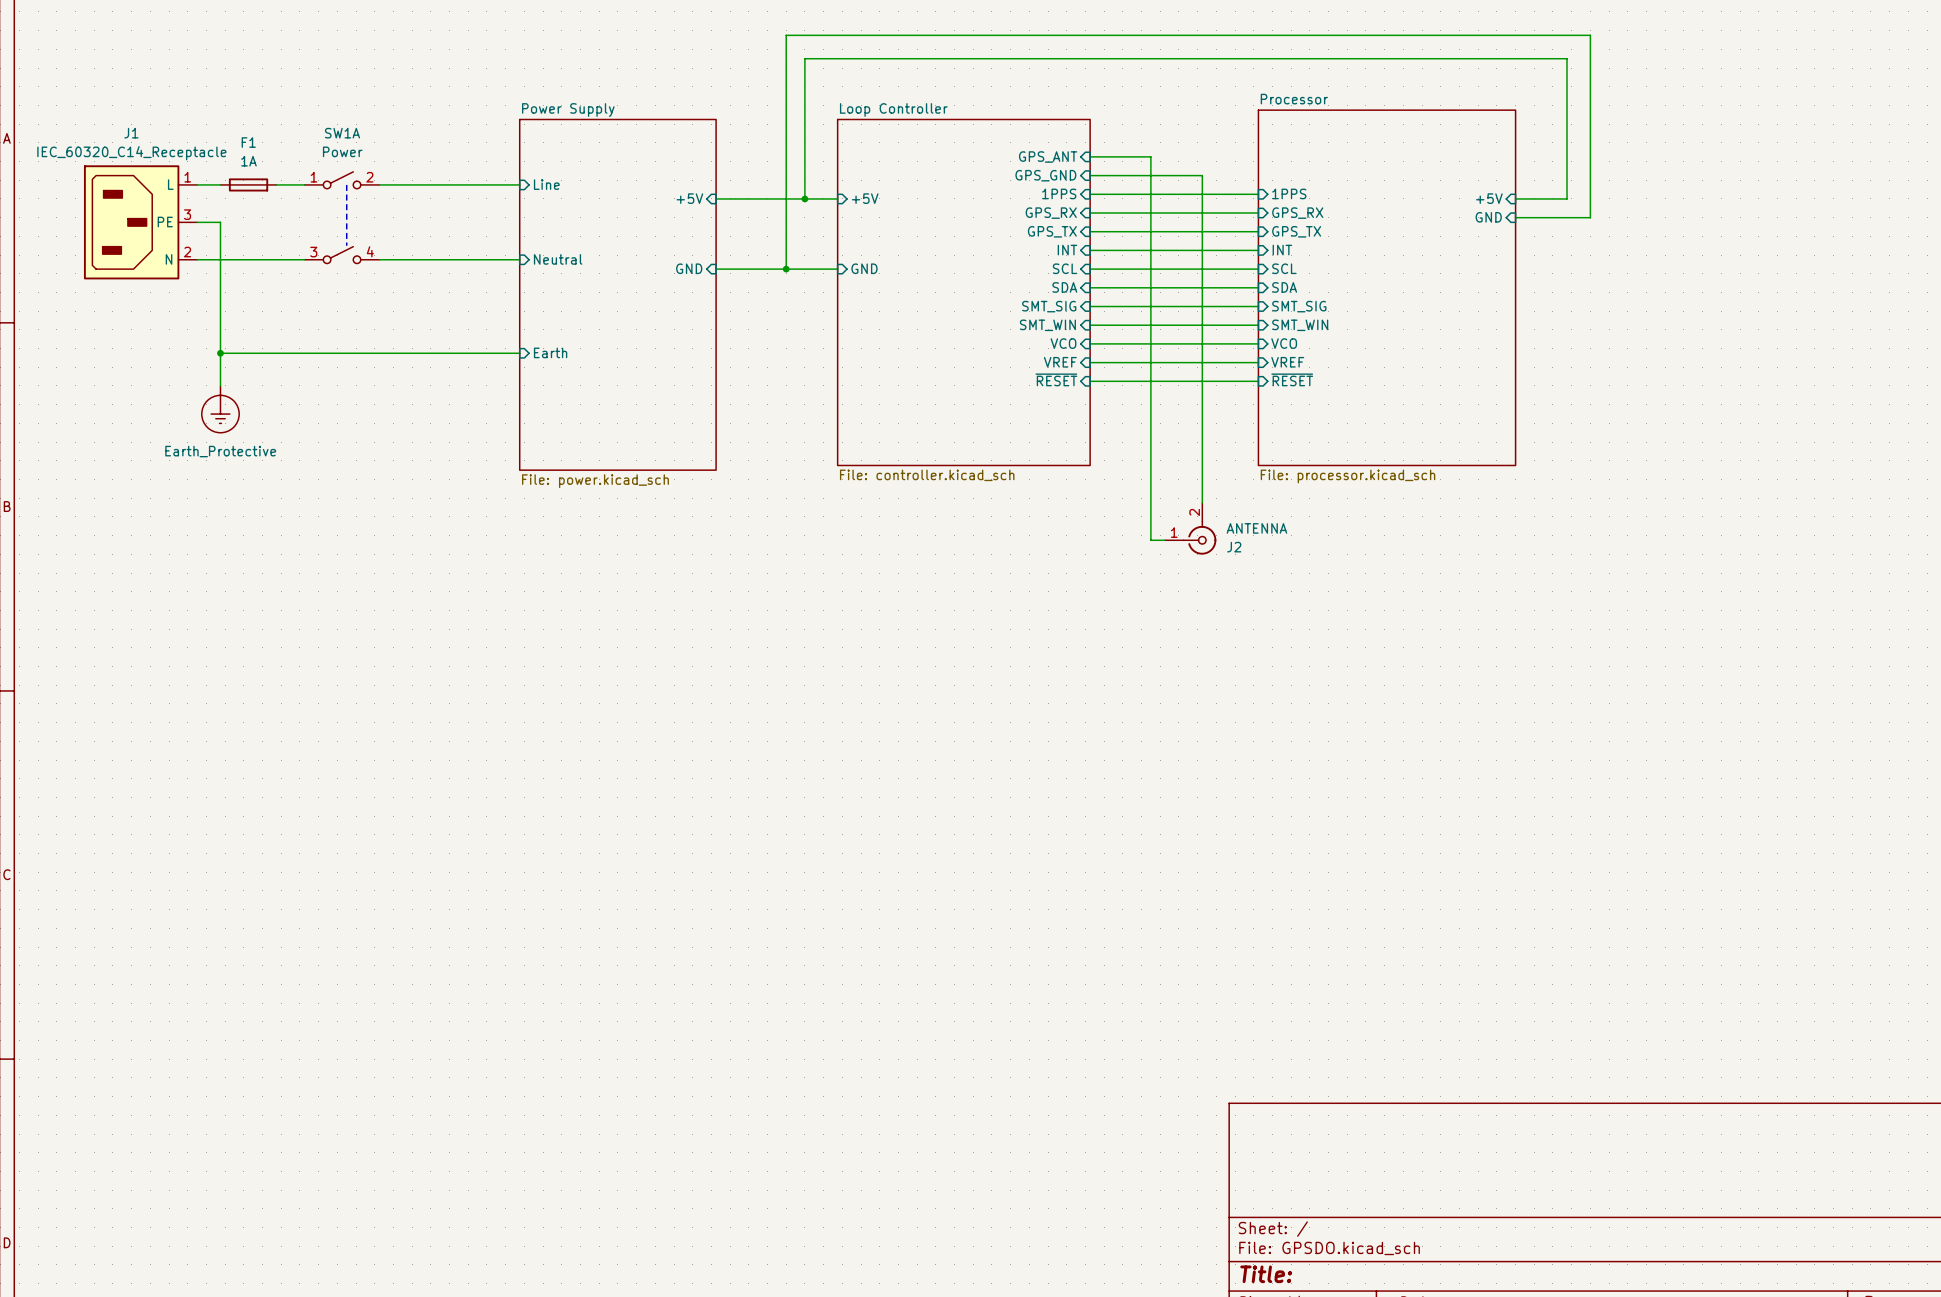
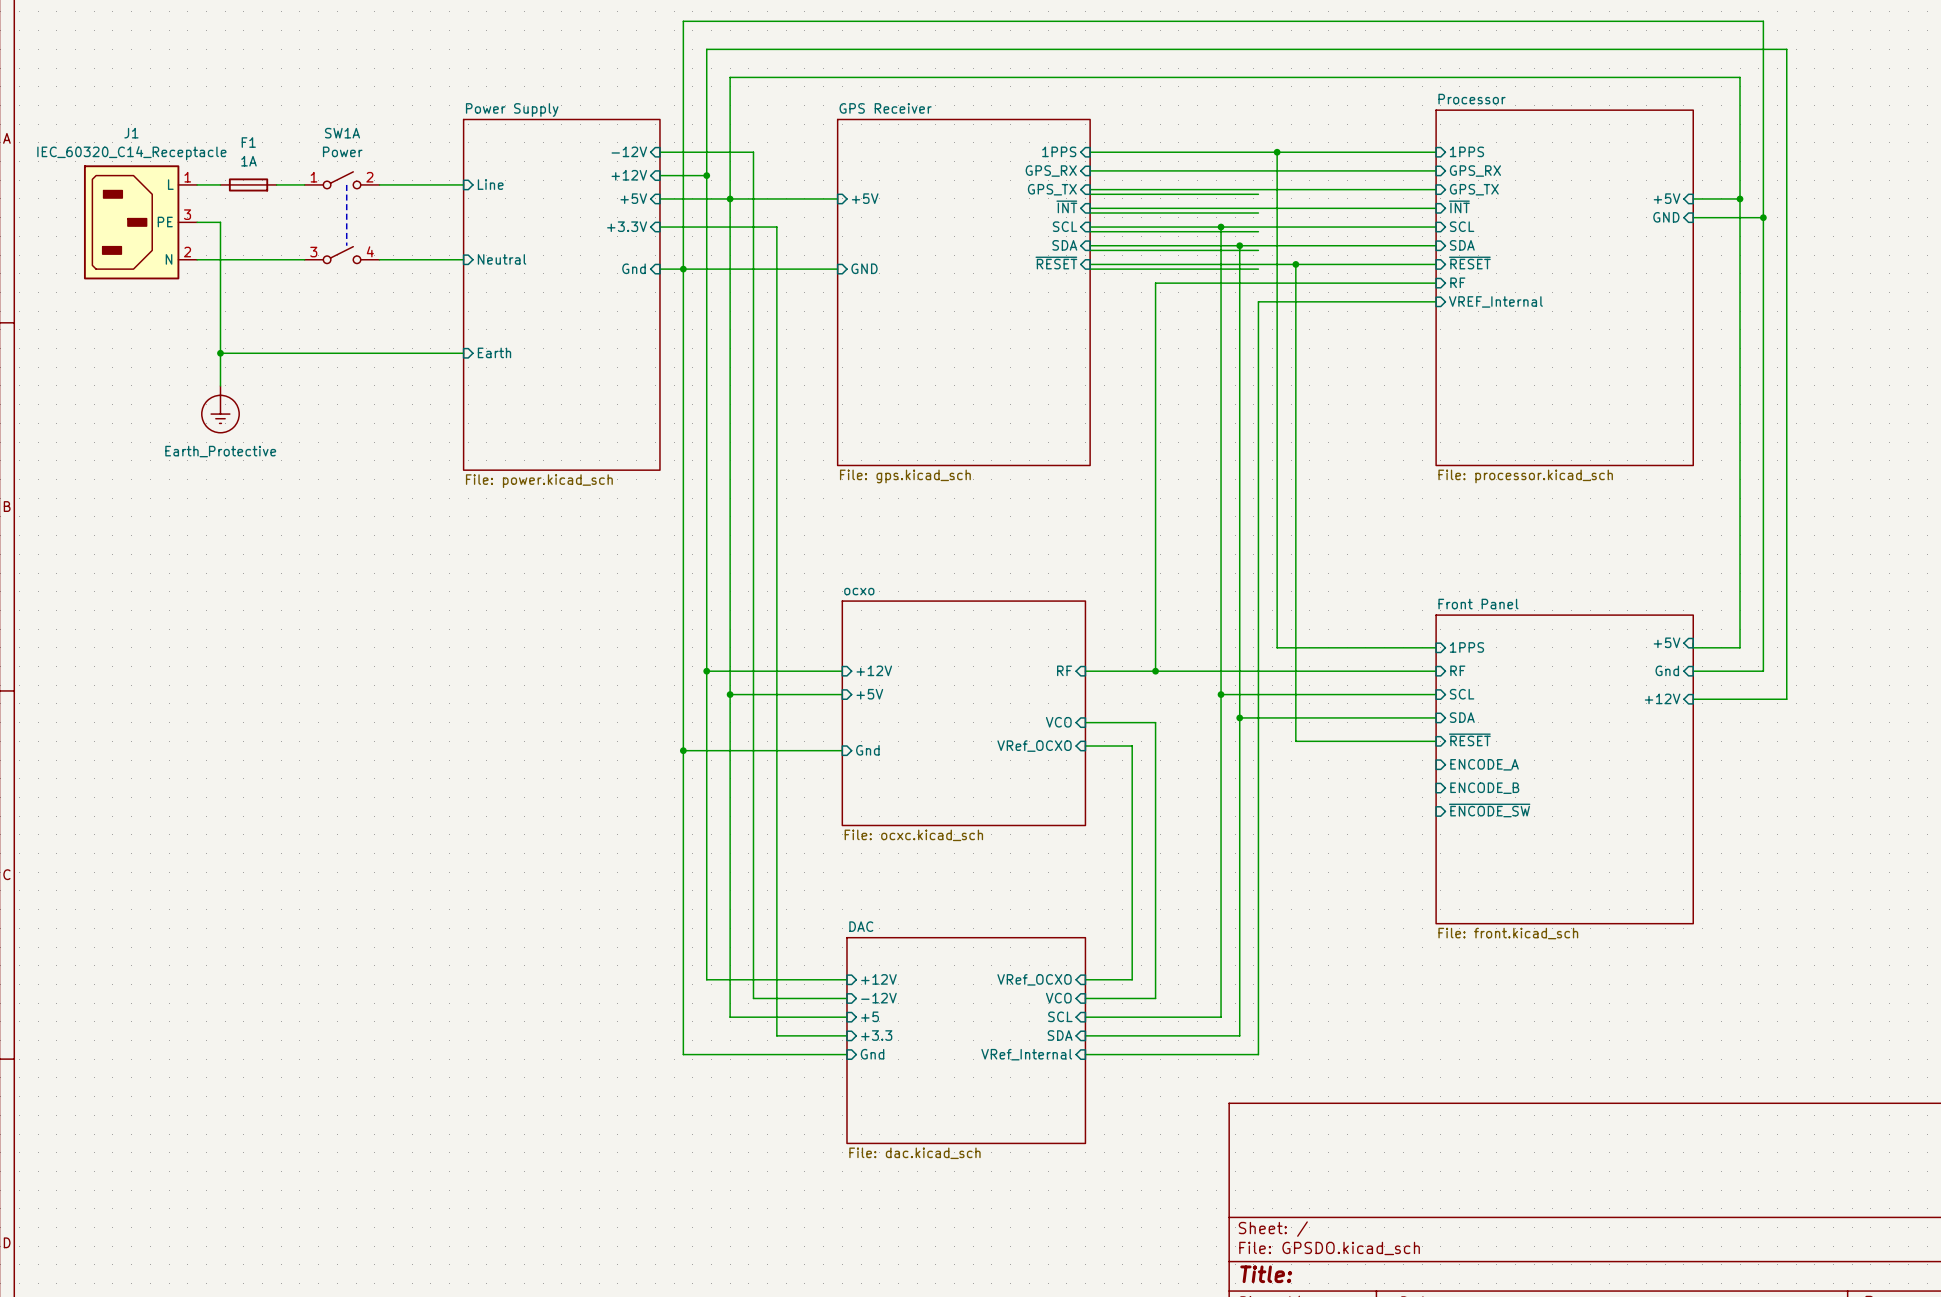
sheet Loop Controller name: Loop Controller (893, 109) -> GPS Receiver (885, 108)
sheet pin: none -> -12V (629, 151)
sheet pin: none -> 1PPS (1466, 151)
wire: none -> (659, 152) (753, 152) (753, 998) (846, 998)
wire: none -> (1090, 152) (1436, 152)
wire: none -> (1277, 152) (1277, 647) (1436, 647)
junction: none -> (1277, 152)
sheet pin: GPS_ANT (1048, 156) -> none
wire: (1090, 156) (1150, 156) (1150, 540) (1164, 540) -> none
wire: none -> (1090, 170) (1436, 170)
sheet pin: none -> GPS_RX (1475, 171)
sheet pin: none -> +12V (629, 175)
wire: none -> (659, 175) (706, 175)
junction: none -> (706, 175)
sheet pin: GPS_GND (1045, 175) -> none
wire: (1090, 175) (1202, 175) (1202, 502) -> none
wire: (463, 184) (519, 184) -> none
sheet pin position: Line (546, 184) -> Line (490, 184)
wire: none -> (1090, 189) (1436, 189)
sheet pin: none -> GPS_TX (1474, 189)
sheet pin position: 1PPS (1059, 193) -> 1PPS (1059, 151)
sheet pin: 1PPS (1289, 193) -> none
wire: none -> (659, 198) (716, 198)
sheet pin position: +5V (689, 198) -> +5V (633, 198)
junction: none -> (730, 198)
wire: (804, 198) (804, 58) (1567, 58) (1567, 198) (1515, 198) -> none
junction: (804, 198) -> none
sheet pin position: +5V (1489, 198) -> +5V (1667, 198)
wire: none -> (1693, 198) (1740, 198)
junction: none -> (1740, 198)
sheet pin: none -> ~{INT} (1066, 206)
sheet pin: none -> ~{INT} (1459, 206)
wire: none -> (1090, 208) (1436, 208)
sheet pin position: GPS_RX (1051, 213) -> GPS_RX (1051, 171)
sheet pin: GPS_RX (1297, 213) -> none
sheet pin position: GND (1488, 217) -> GND (1666, 217)
wire: (1515, 217) (1590, 217) (1590, 35) (786, 35) (786, 269) -> none
wire: none -> (1693, 217) (1763, 217)
junction: none -> (1763, 217)
sheet pin: none -> +3.3V (627, 226)
sheet pin: none -> SCL (1462, 226)
wire: none -> (659, 227) (776, 227) (776, 1035) (846, 1035)
wire: none -> (1090, 227) (1436, 227)
wire: none -> (1221, 227) (1221, 1017) (1085, 1017)
junction: none -> (1221, 227)
sheet pin position: GPS_TX (1052, 231) -> GPS_TX (1052, 189)
sheet pin: GPS_TX (1296, 231) -> none
wire: none -> (1090, 245) (1436, 245)
wire: none -> (1239, 245) (1239, 1035) (1085, 1035)
junction: none -> (1239, 245)
sheet pin: none -> SDA (1462, 245)
sheet pin: INT (1067, 250) -> none
sheet pin: INT (1282, 250) -> none
wire: (463, 259) (519, 259) -> none
sheet pin position: Neutral (558, 259) -> Neutral (502, 259)
sheet pin: none -> ~{RESET} (1056, 263)
sheet pin: none -> ~{RESET} (1469, 263)
wire: none -> (1090, 264) (1436, 264)
wire: none -> (1295, 264) (1295, 741) (1436, 741)
junction: none -> (1295, 264)
sheet pin: none -> Gnd (634, 268)
sheet pin: GND (689, 268) -> none
sheet pin position: SCL (1065, 268) -> SCL (1065, 226)
sheet pin: SCL (1284, 268) -> none
wire: none -> (659, 269) (716, 269)
junction: none -> (683, 269)
junction: (786, 269) -> none
sheet pin: none -> RF (1457, 282)
wire: none -> (1436, 283) (1155, 283) (1155, 671)
sheet pin position: SDA (1064, 287) -> SDA (1064, 245)
wire: (1090, 287) (1258, 287) -> none
sheet pin: SDA (1284, 287) -> none
sheet Processor position: (1387, 287) -> (1564, 287)
sheet Power Supply position: (617, 294) -> (561, 294)
wire: none -> (1436, 301) (1258, 301) (1258, 1054) (1085, 1054)
sheet pin: none -> VREF_Internal (1495, 301)
sheet pin: SMT_SIG (1049, 306) -> none
wire: (1090, 306) (1258, 306) -> none
sheet pin: SMT_SIG (1299, 306) -> none
sheet pin: SMT_WIN (1047, 325) -> none
wire: (1090, 325) (1258, 325) -> none
sheet pin: SMT_WIN (1300, 325) -> none
sheet pin: VCO (1063, 343) -> none
wire: (1090, 343) (1258, 343) -> none
sheet pin: VCO (1284, 343) -> none
sheet pin position: Earth (550, 352) -> Earth (494, 352)
wire: (463, 353) (519, 353) -> none
sheet pin: VREF (1060, 362) -> none
wire: (1090, 362) (1258, 362) -> none
sheet pin: VREF (1287, 362) -> none
sheet pin: ~{RESET} (1056, 379) -> none
sheet pin: ~{RESET} (1292, 379) -> none
wire: (1090, 381) (1258, 381) -> none
sheet Loop Controller value: File: controller.kicad_sch (927, 475) -> File: gps.kicad_sch (905, 476)
J2: ANTENNA (1190, 528) -> none
sheet pin: none -> +5V (1667, 642)
wire: none -> (1693, 643) (1693, 647) (1740, 647) (1740, 77) (730, 77) (730, 1017) (846, 1017)
sheet pin: none -> 1PPS (1466, 647)
sheet pin: none -> +12V (874, 670)
sheet pin: none -> RF (1064, 670)
sheet pin: none -> RF (1457, 670)
sheet pin: none -> Gnd (1667, 670)
wire: none -> (706, 671) (842, 671)
junction: none -> (706, 671)
wire: none -> (1085, 671) (1436, 671)
junction: none -> (1155, 671)
wire: none -> (1693, 671) (1763, 671) (1763, 21) (683, 21) (683, 1054) (846, 1054)
wire: none -> (730, 694) (842, 694)
junction: none -> (730, 694)
sheet pin: none -> +5V (869, 694)
wire: none -> (1221, 694) (1436, 694)
junction: none -> (1221, 694)
sheet pin: none -> SCL (1462, 694)
sheet pin: none -> +12V (1662, 698)
wire: none -> (1693, 699) (1786, 699) (1786, 49) (706, 49) (706, 979) (846, 979)
sheet ocxo: none -> File: ocxc.kicad_sch (963, 713)
wire: none -> (1239, 717) (1436, 717)
junction: none -> (1239, 717)
sheet pin: none -> SDA (1462, 717)
sheet pin: none -> VCO (1058, 722)
wire: none -> (1085, 722) (1155, 722) (1155, 998) (1085, 998)
sheet pin: none -> ~{RESET} (1469, 739)
sheet pin: none -> VRef_OCXO (1034, 746)
wire: none -> (1085, 746) (1132, 746) (1132, 979) (1085, 979)
wire: none -> (683, 750) (842, 750)
junction: none -> (683, 750)
sheet pin: none -> Gnd (867, 750)
sheet pin: none -> ENCODE_A (1484, 764)
sheet Front Panel: none -> File: front.kicad_sch (1564, 769)
sheet pin: none -> ENCODE_B (1484, 788)
sheet pin: none -> ~{ENCODE_SW} (1489, 810)
sheet pin: none -> +12V (878, 979)
sheet pin: none -> VRef_OCXO (1034, 979)
sheet pin: none -> -12V (878, 998)
sheet pin: none -> VCO (1058, 998)
sheet pin: none -> +5 (870, 1016)
sheet pin: none -> SCL (1060, 1016)
sheet pin: none -> +3.3 (876, 1035)
sheet pin: none -> SDA (1060, 1035)
sheet DAC: none -> File: dac.kicad_sch (966, 1040)
sheet pin: none -> Gnd (872, 1054)
sheet pin: none -> VRef_Internal (1026, 1054)

